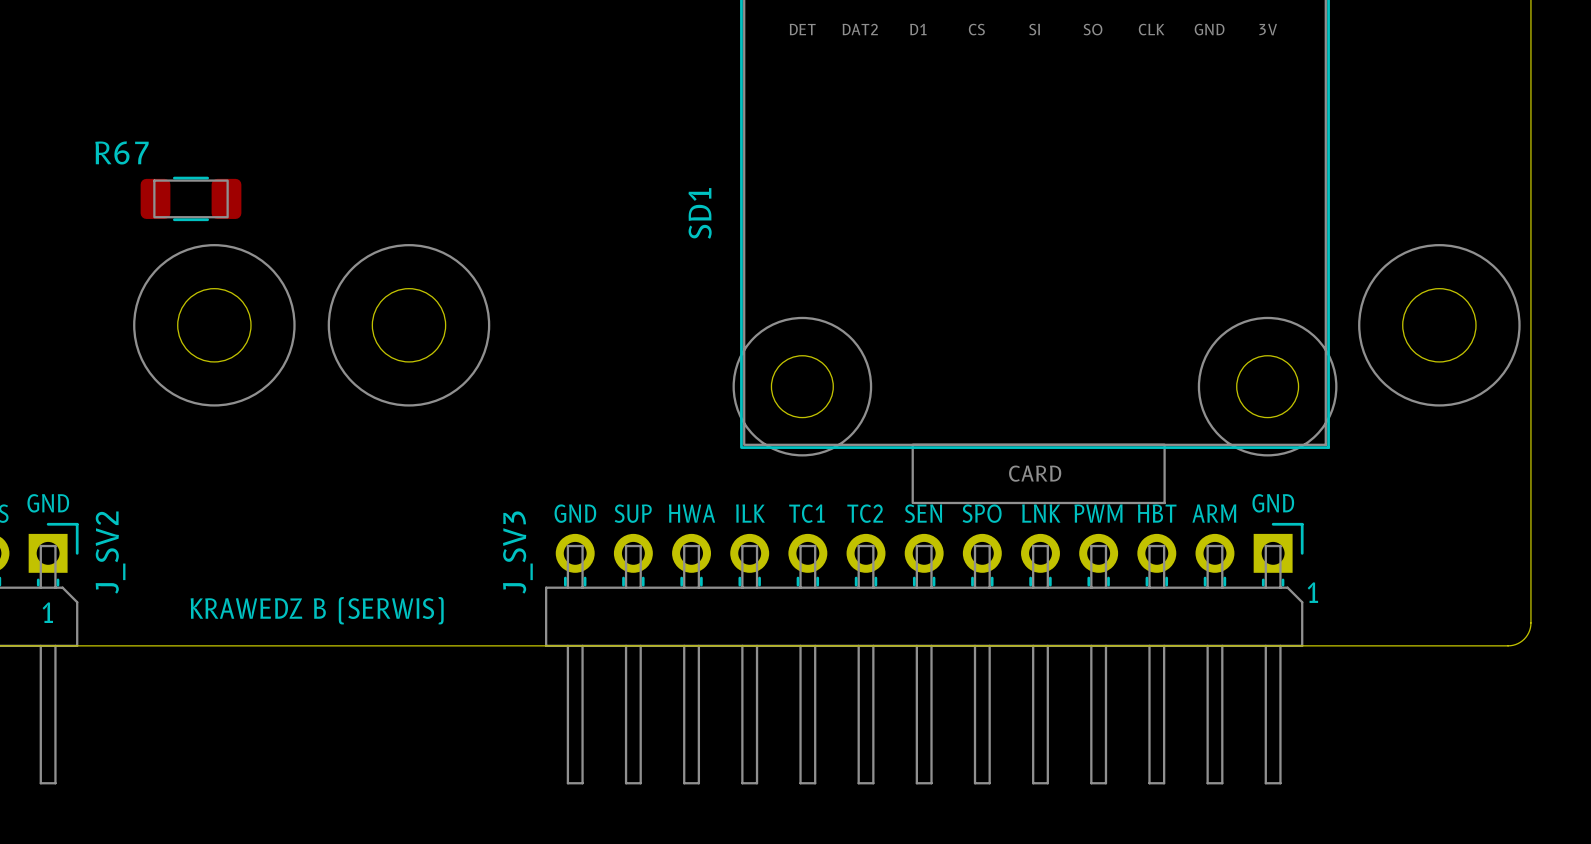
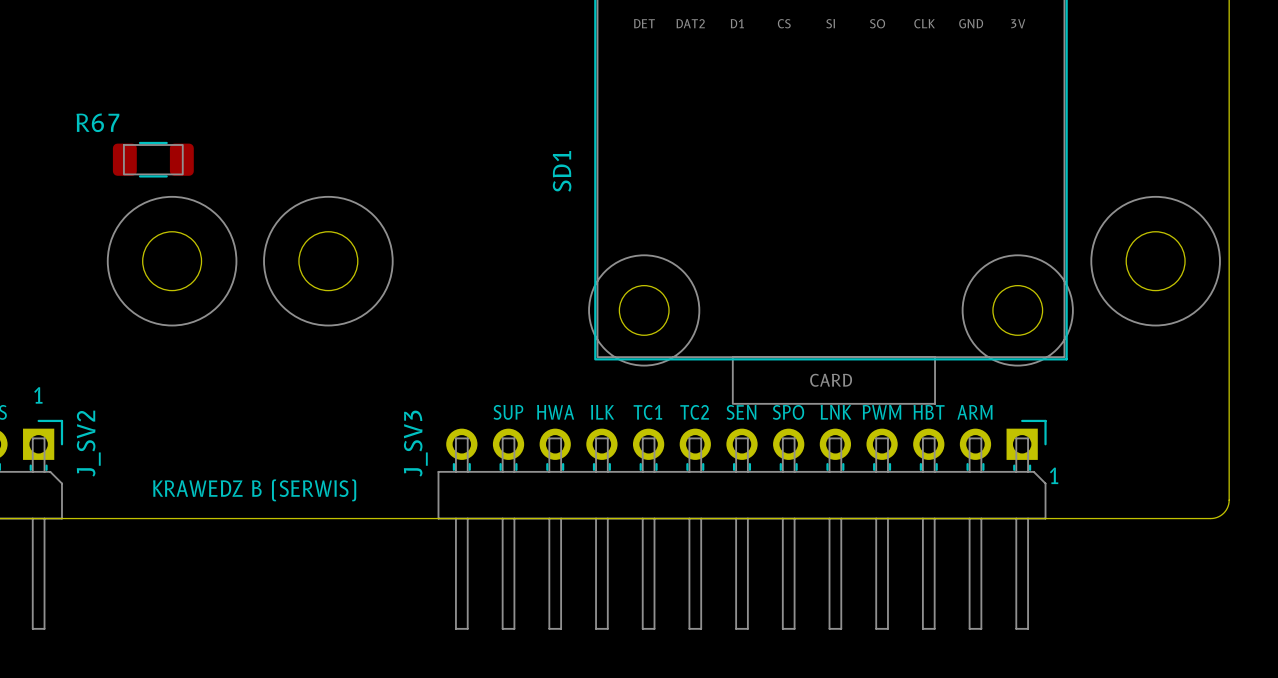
text: GND (48, 503) -> 1 (38, 395)
text: GND (1273, 503) -> none
text: GND (575, 513) -> none
text: 1 (47, 612) -> none

